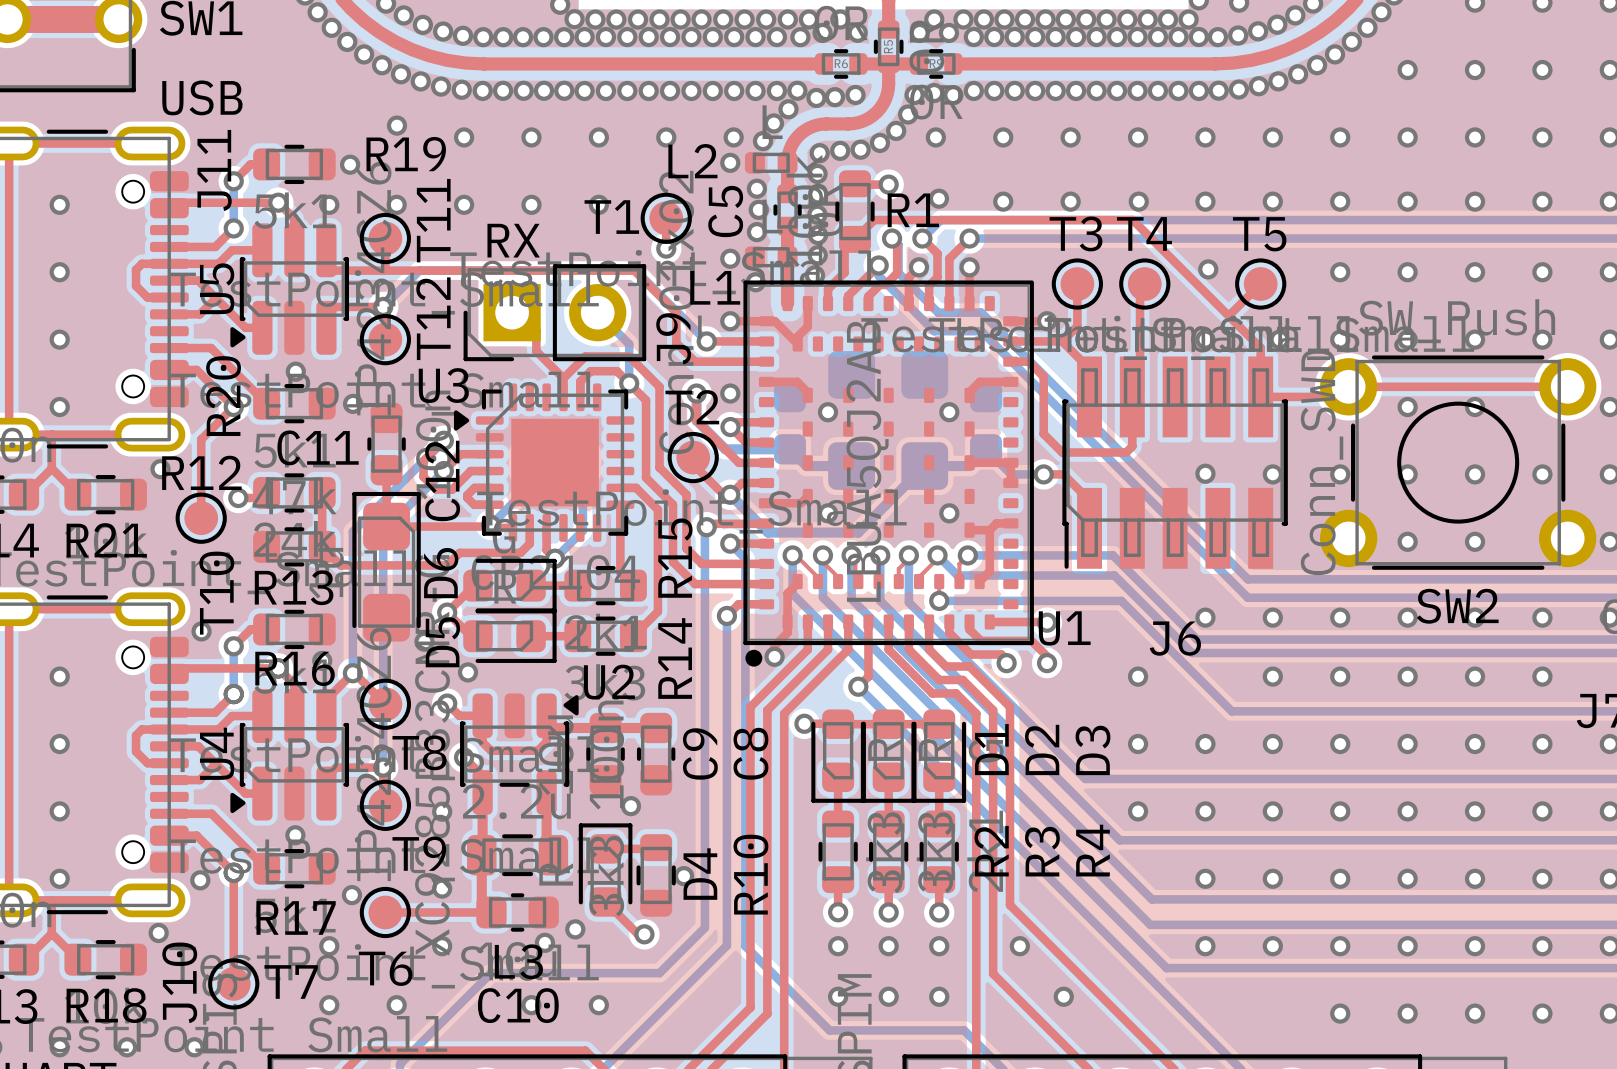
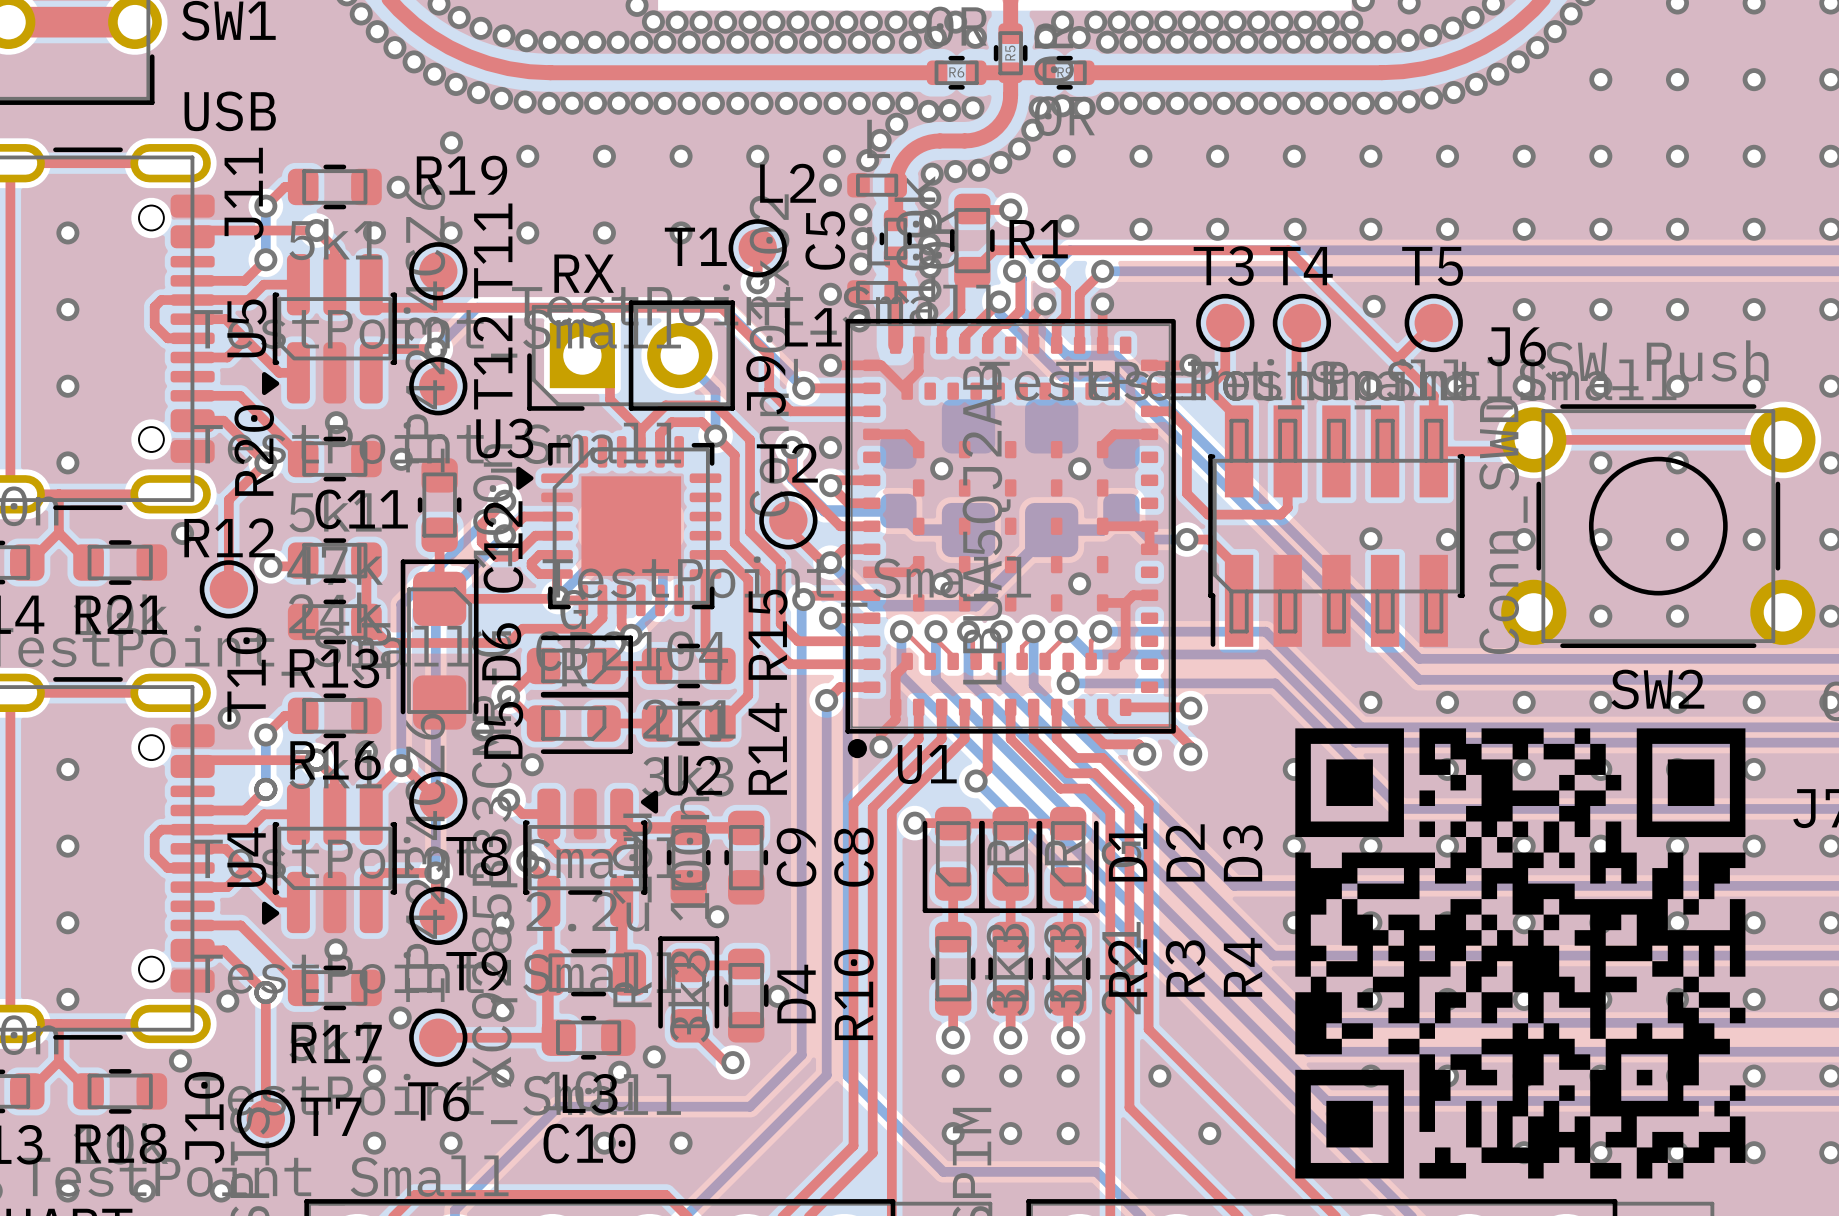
U1 name position: U1 (1064, 628) -> U1 (927, 764)
J6 name position: J6 (1175, 638) -> J6 (1516, 346)
drawing: none -> [1295, 728, 1746, 1179]

